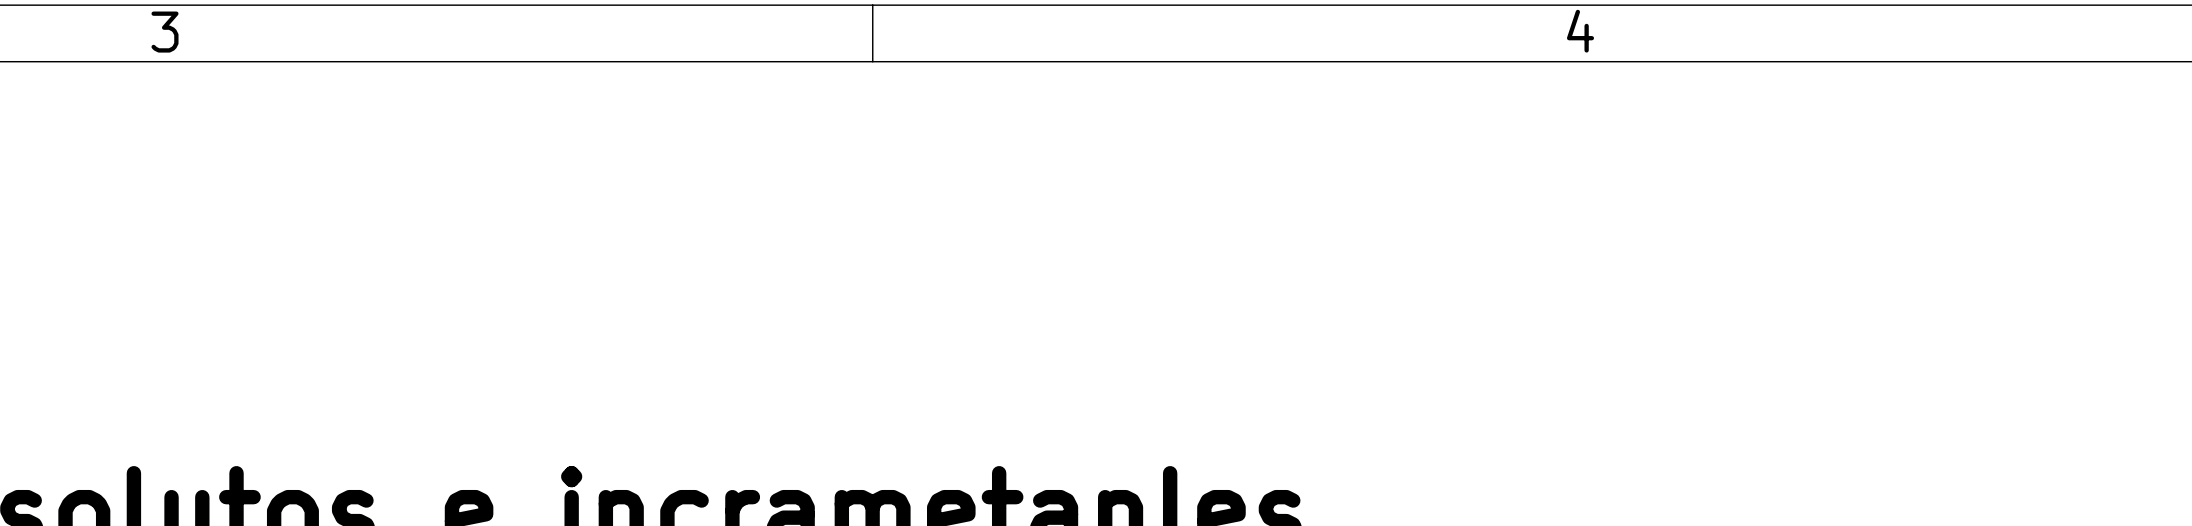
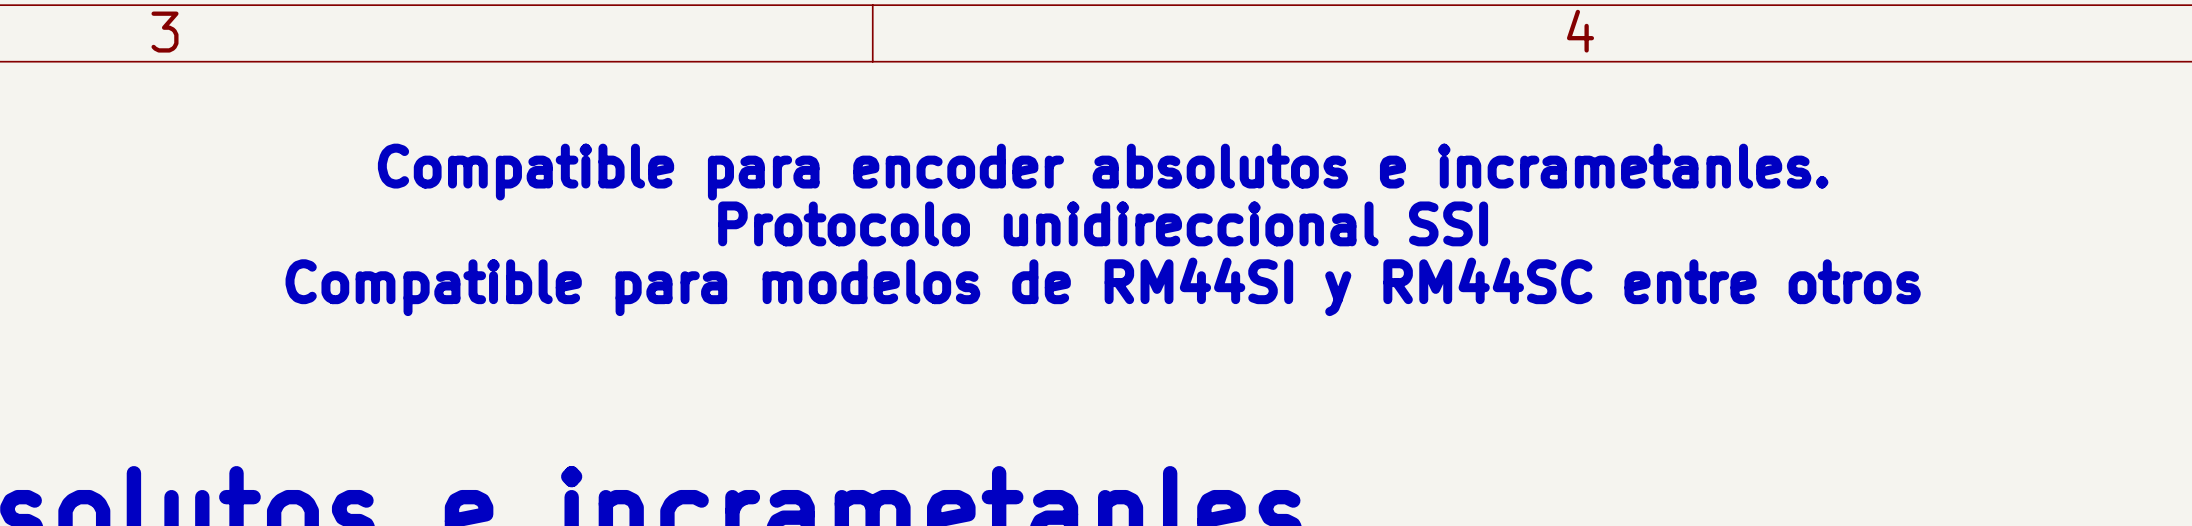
text: none -> Compatible para encoder absolutos e incrametanles. (1103, 172)
text: none -> Protocolo unidireccional SSI (1103, 223)
text: none -> Compatible para modelos de RM44SI y RM44SC entre otros (1103, 286)

